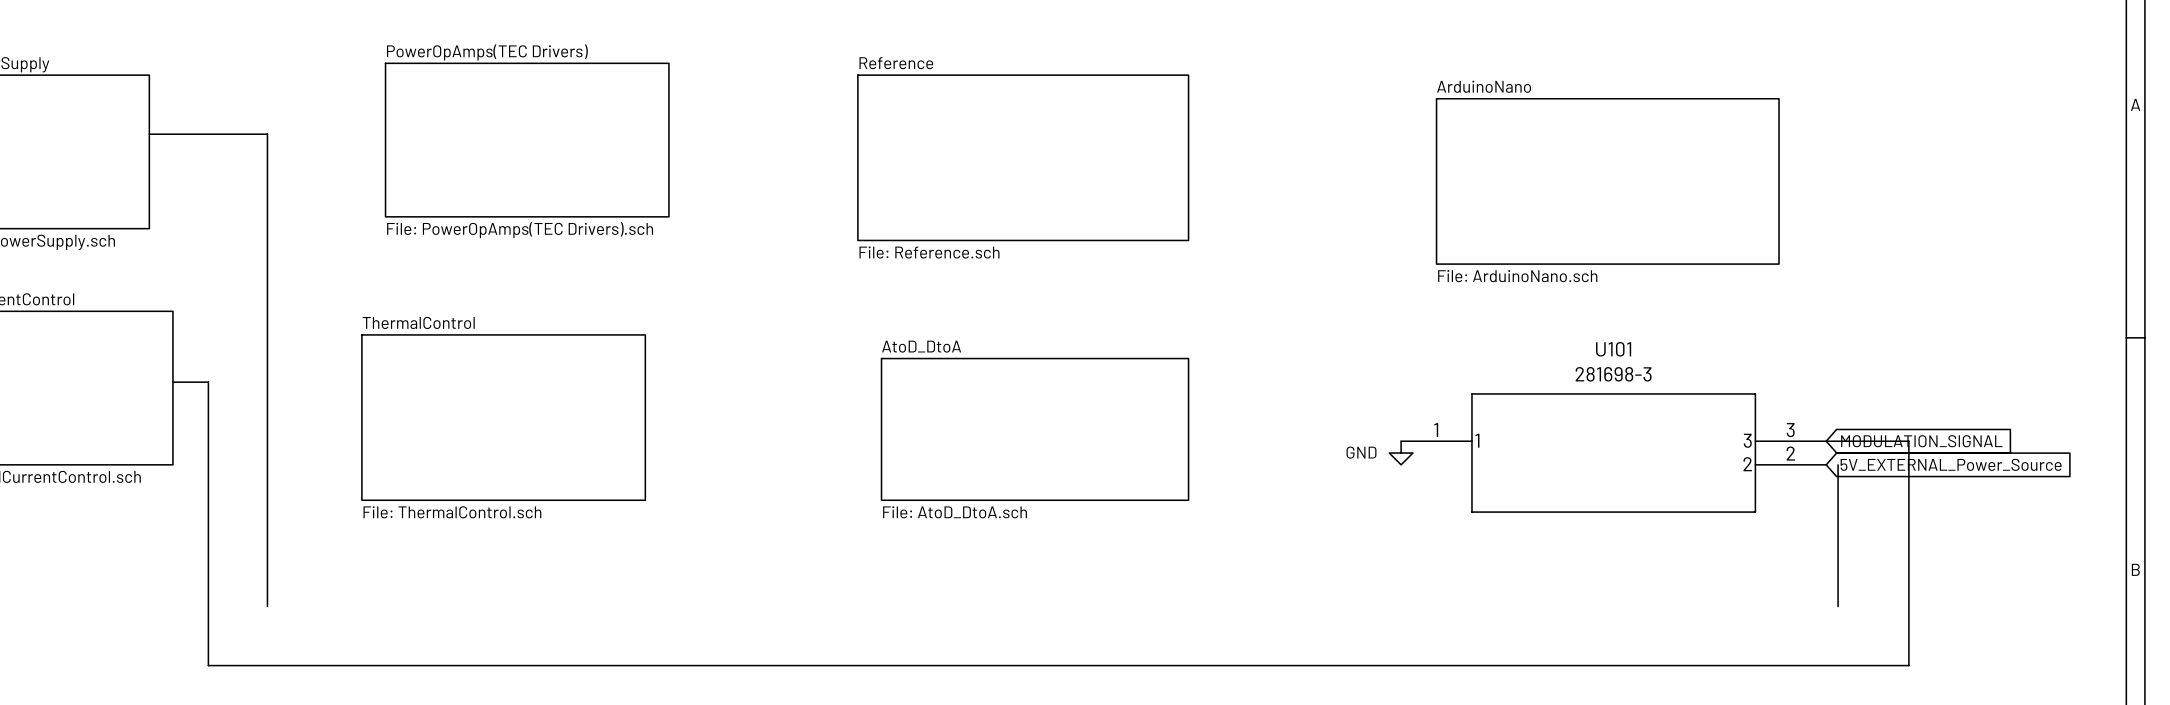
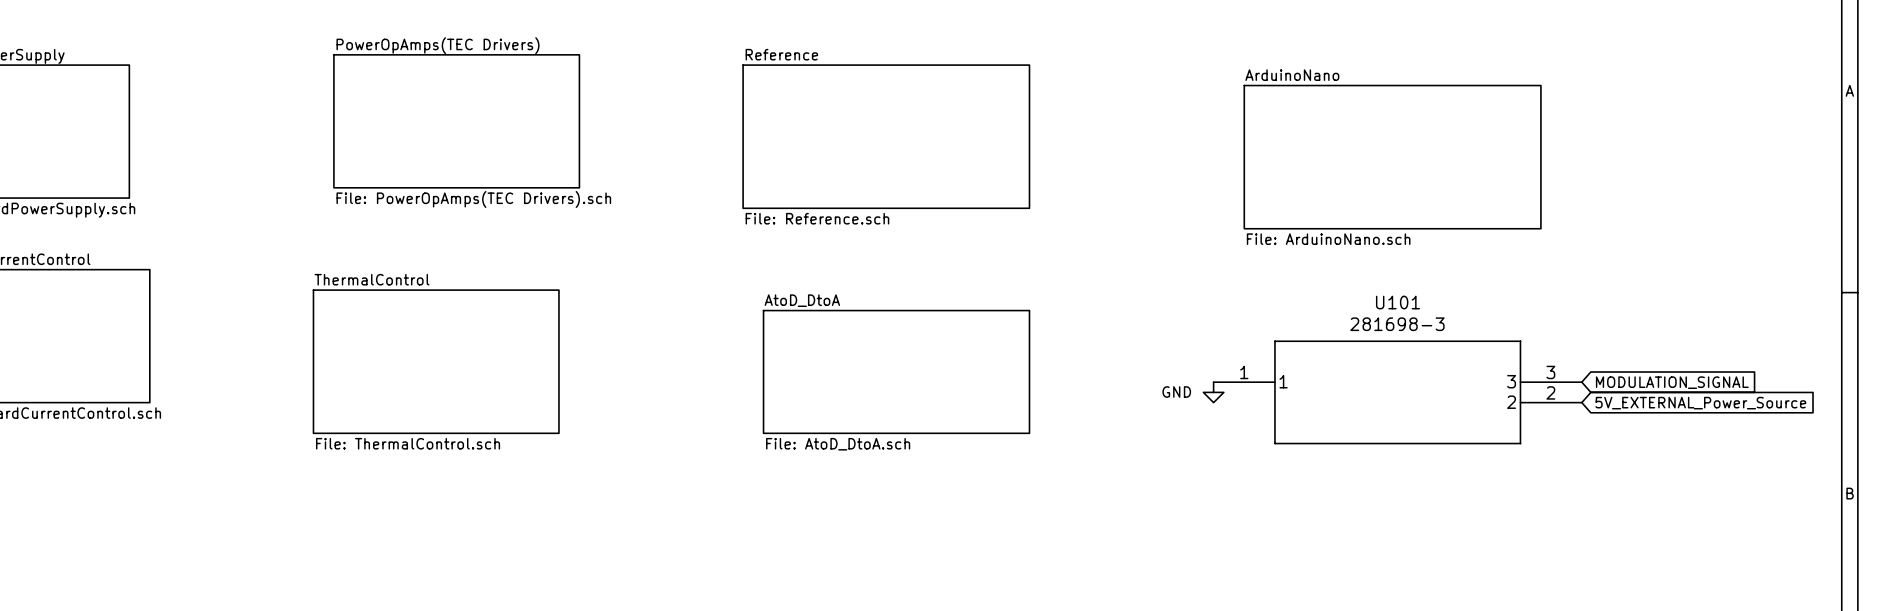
wire: (149, 134) (267, 134) (267, 606) -> none
wire: (172, 382) (208, 382) (208, 665) (1908, 665) (1908, 441) (1826, 441) -> none
wire: (1838, 464) (1838, 606) -> none

